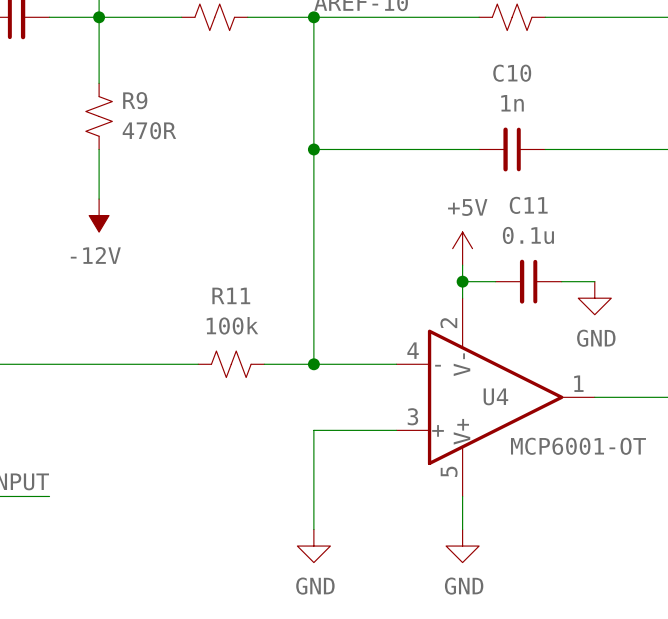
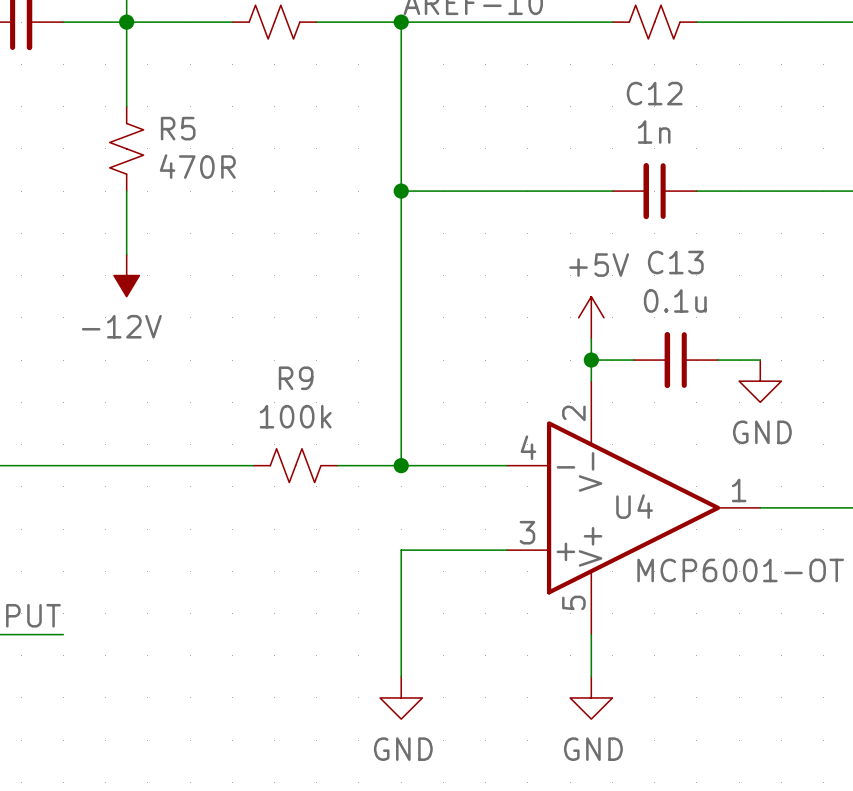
C10 name: C10 (512, 73) -> C12 (654, 93)
R9 name: R9 (135, 100) -> R5 (178, 128)
C11 name: C11 (528, 205) -> C13 (675, 262)
R11 name: R11 (231, 295) -> R9 (296, 378)

